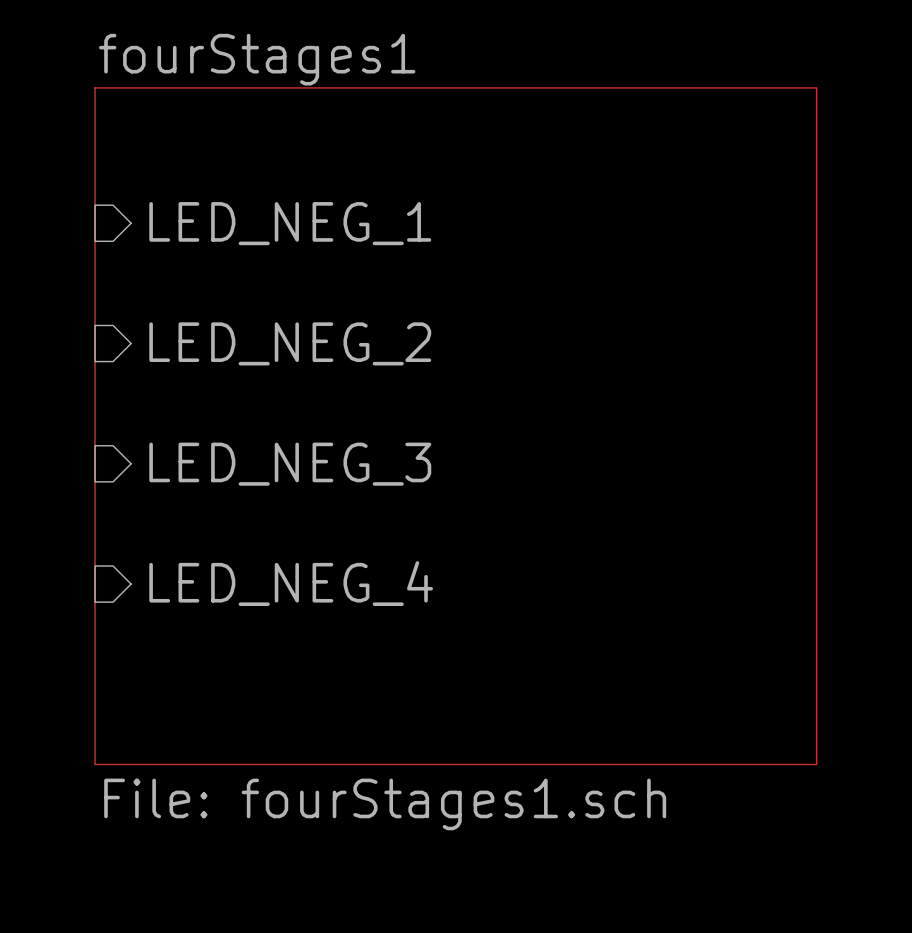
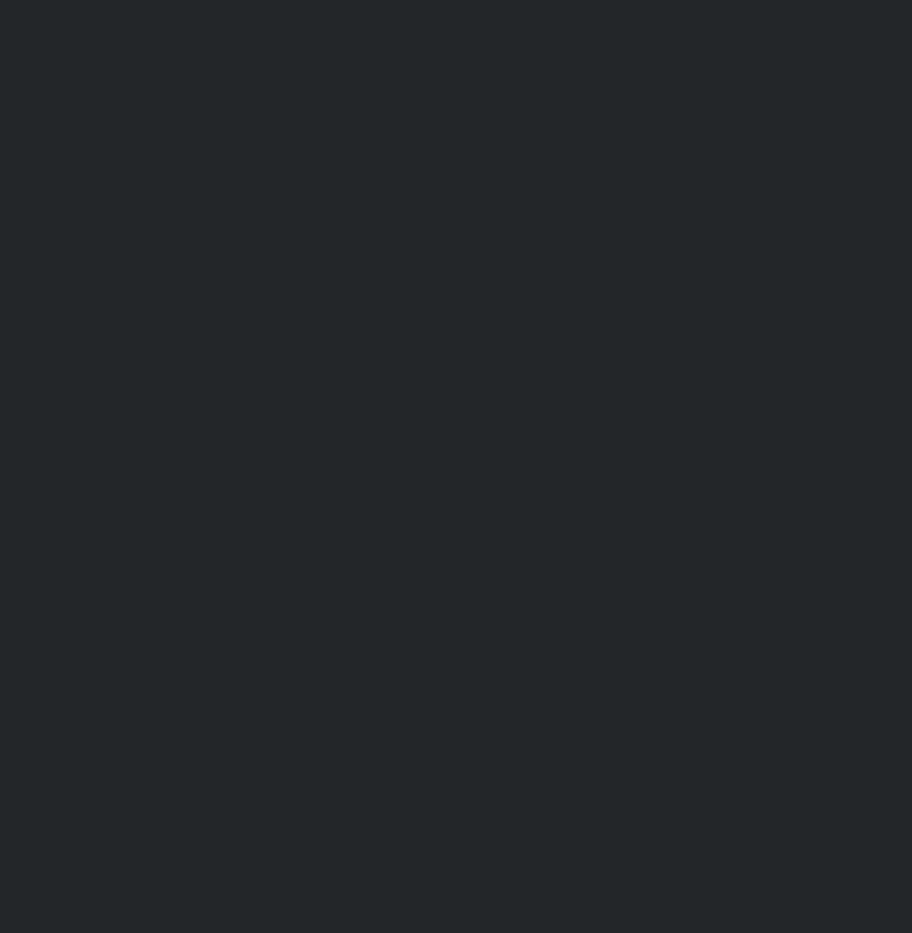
sheet pin: LED_NEG_1 (290, 223) -> none
sheet pin: LED_NEG_2 (290, 343) -> none
sheet fourStages1: File: fourStages1.sch (455, 426) -> none
sheet pin: LED_NEG_3 (290, 464) -> none
sheet pin: LED_NEG_4 (291, 583) -> none

